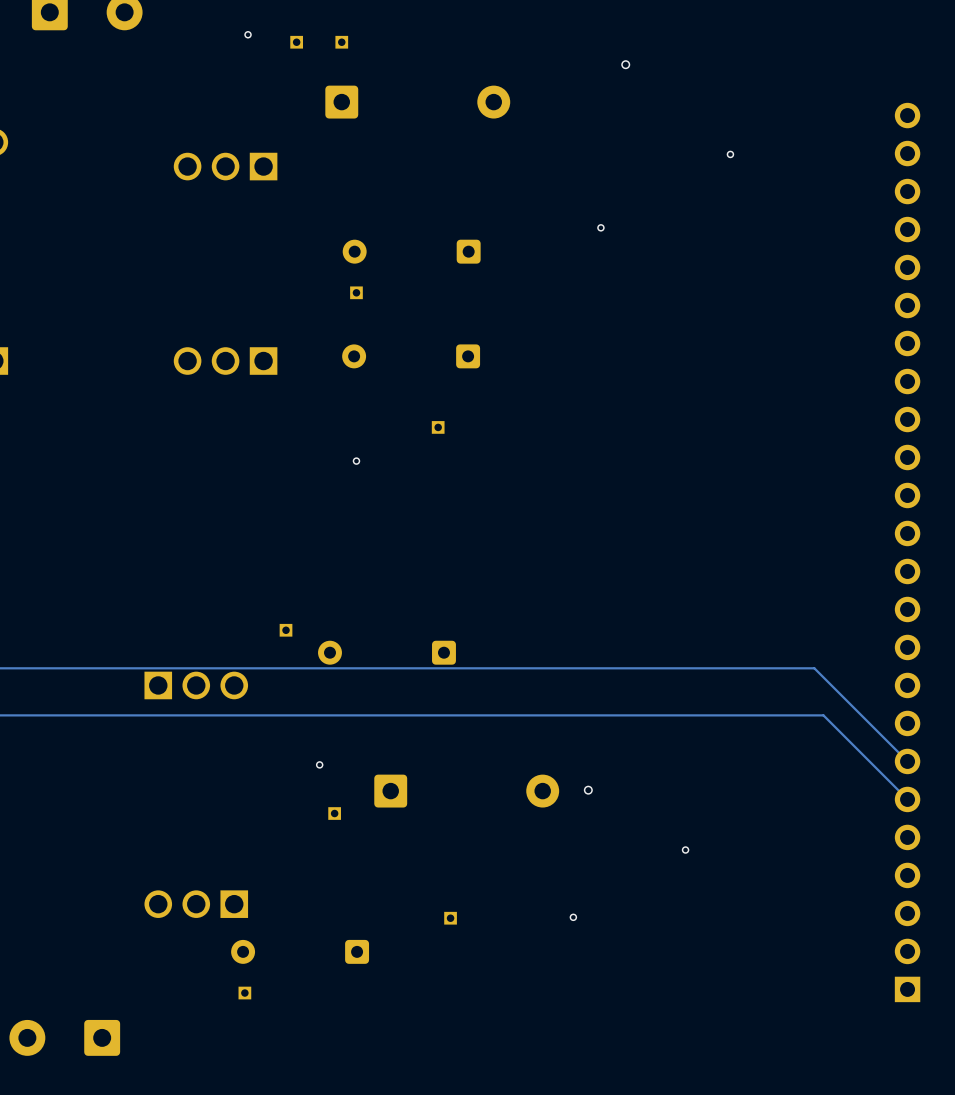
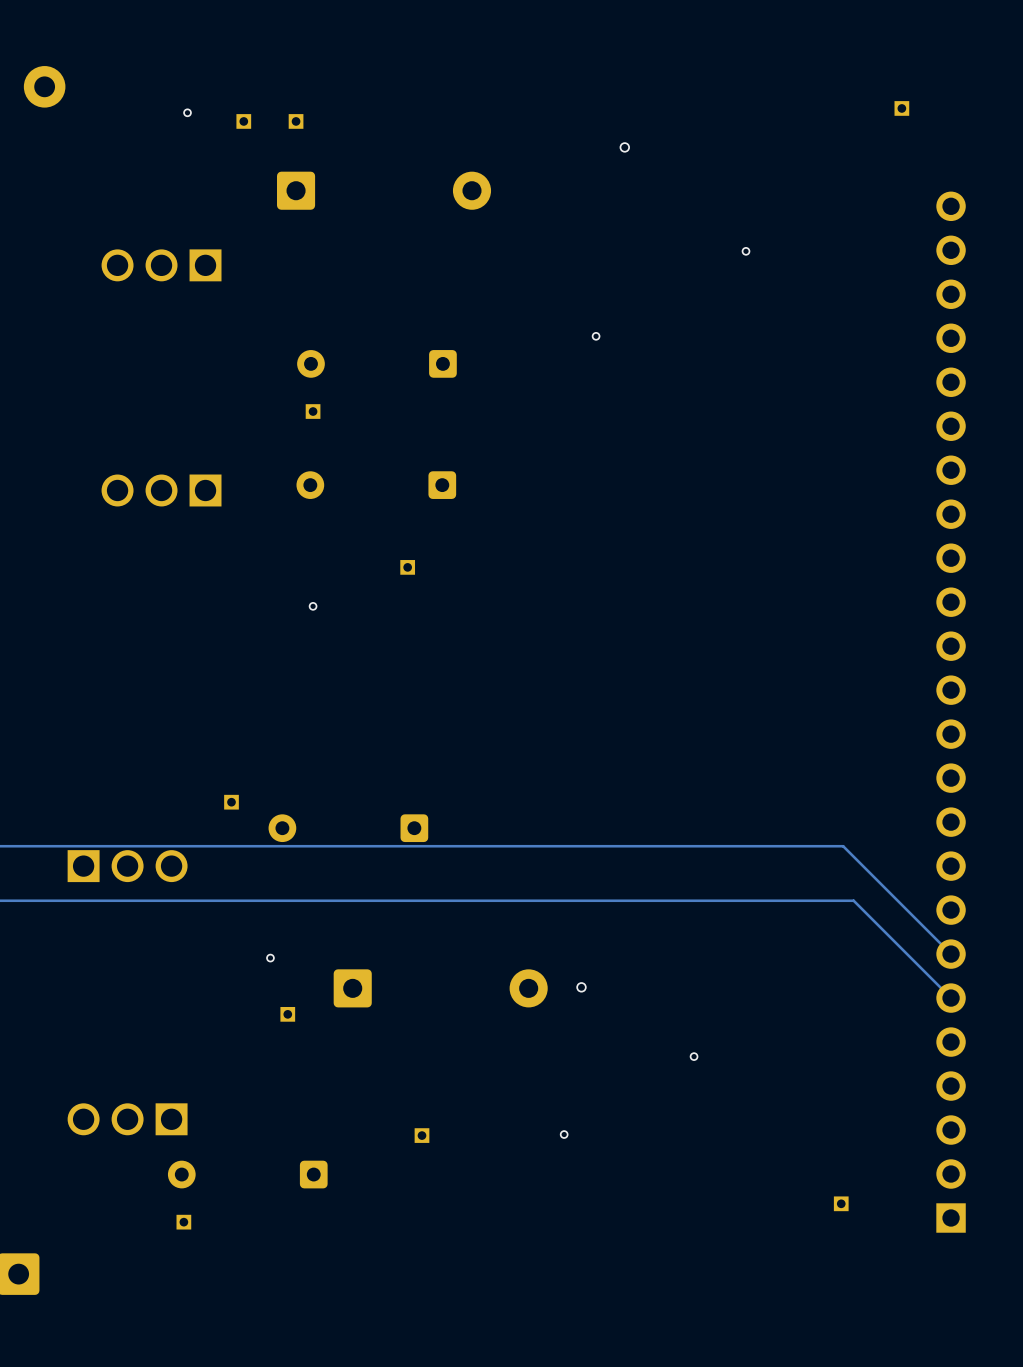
part: none -> (901, 108)
part: none -> (841, 1203)

